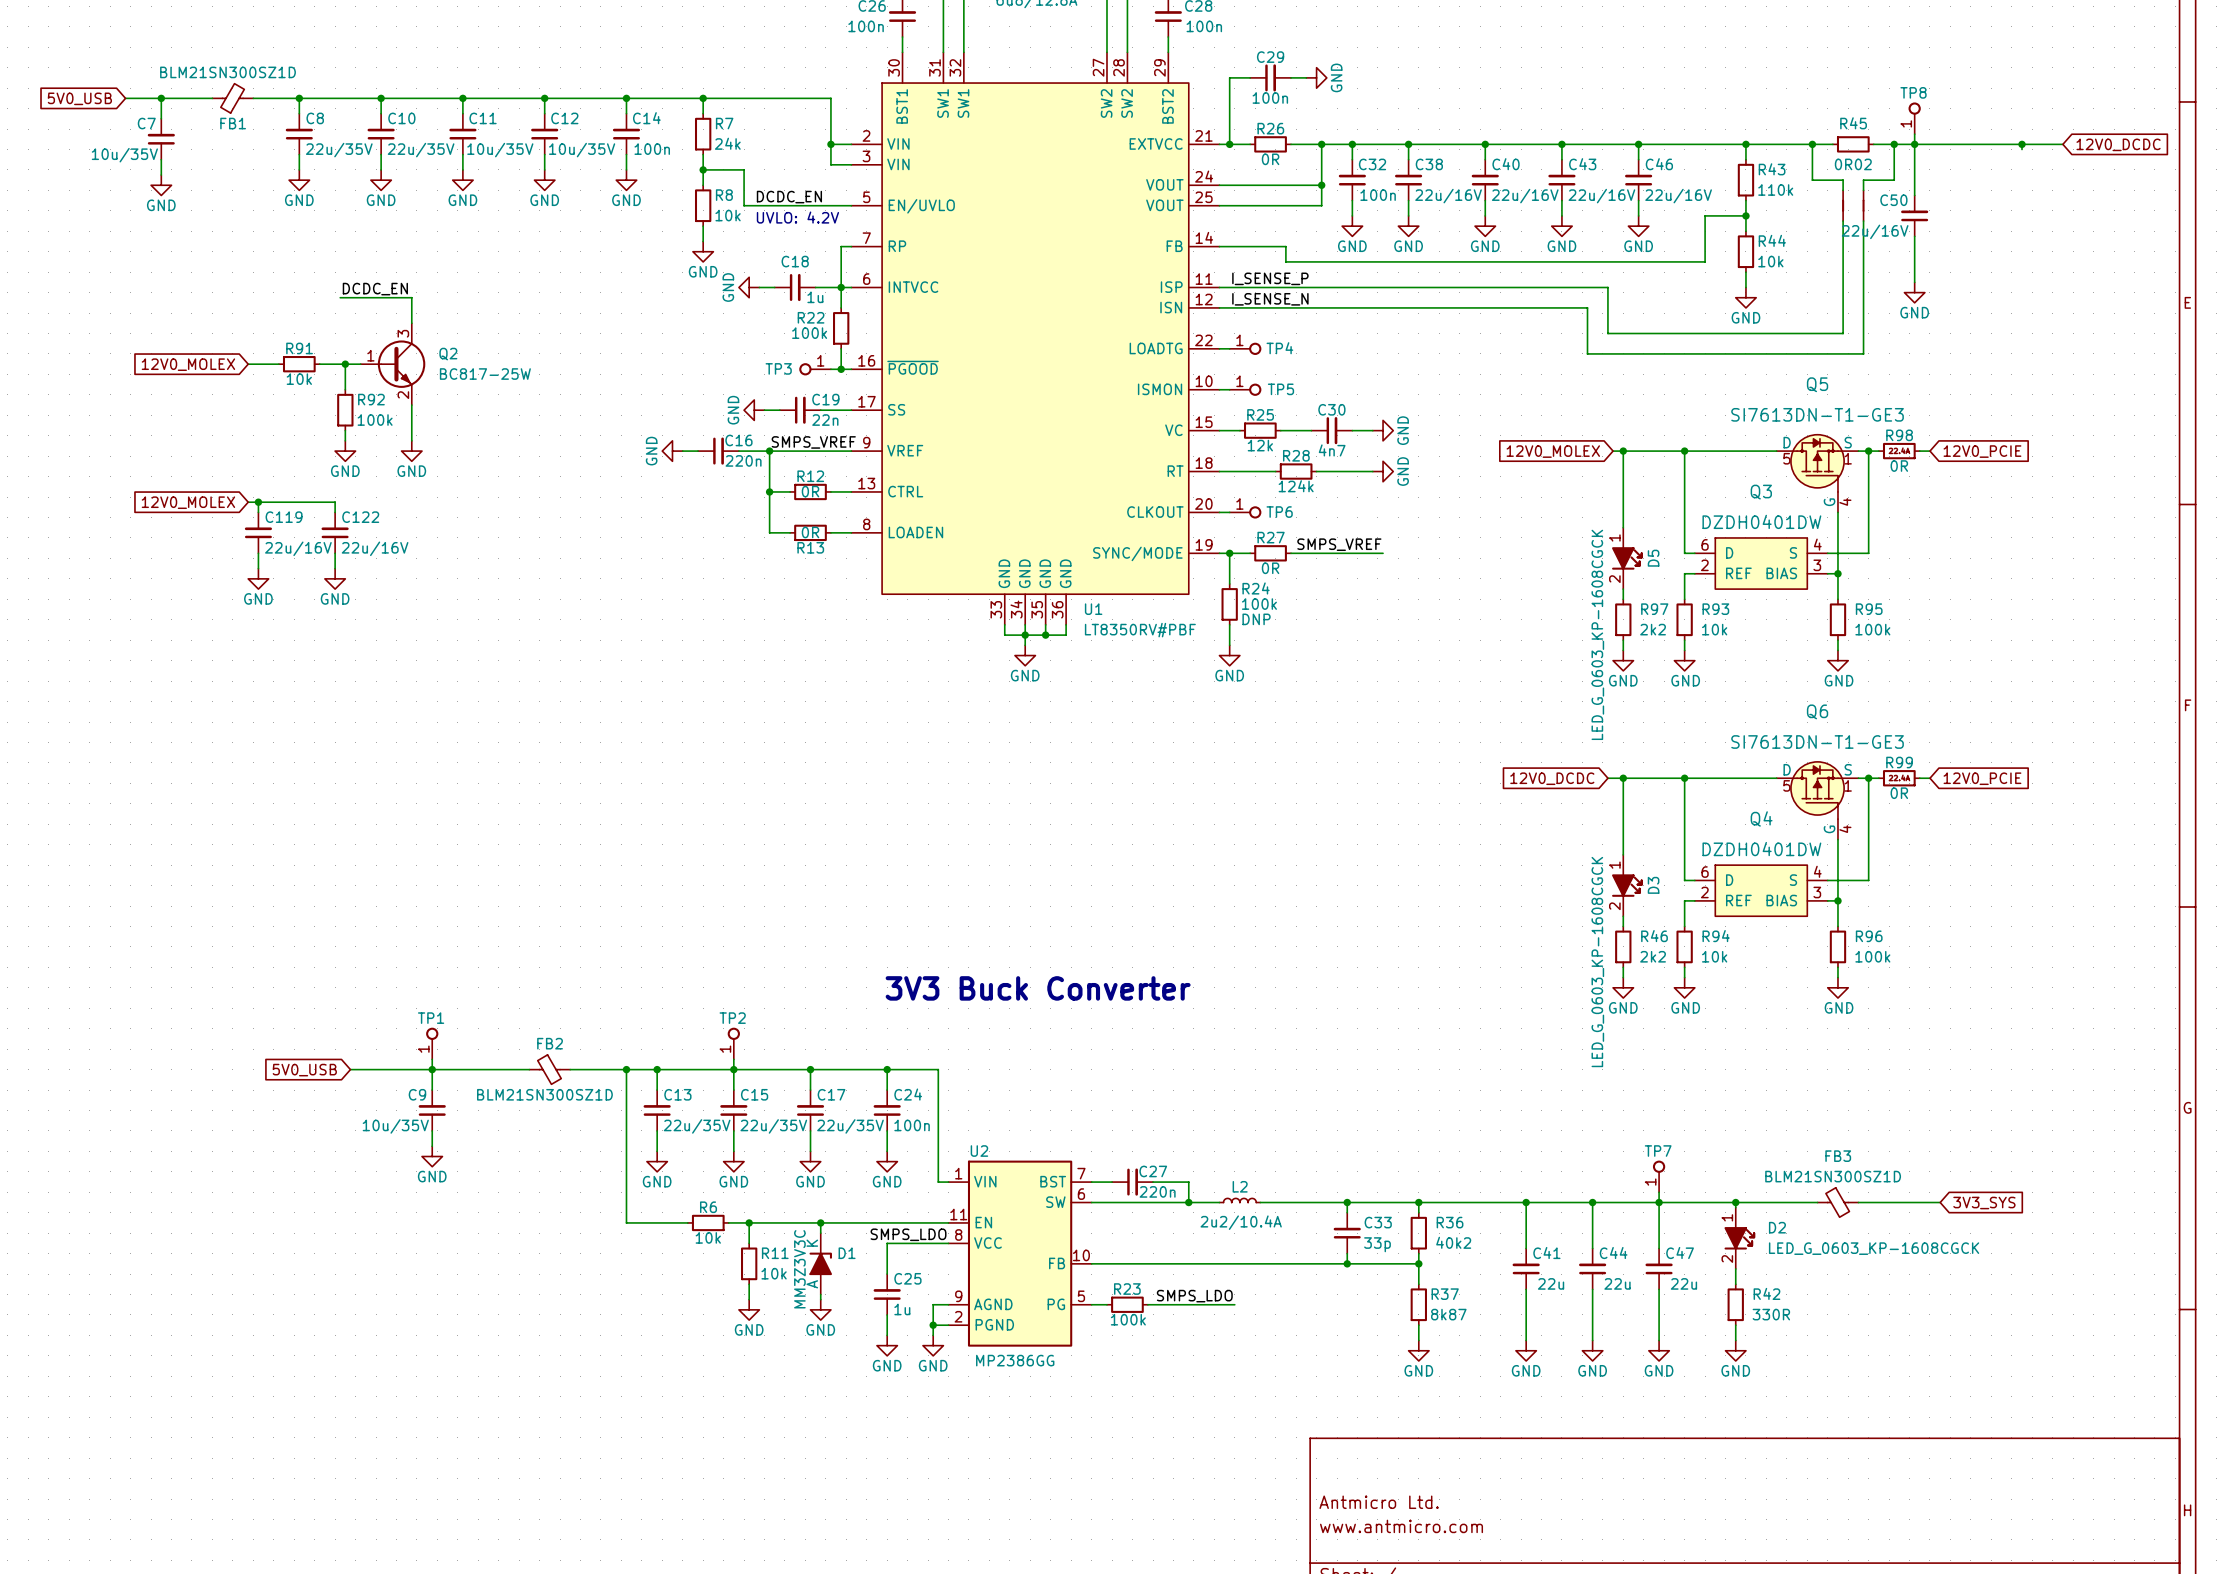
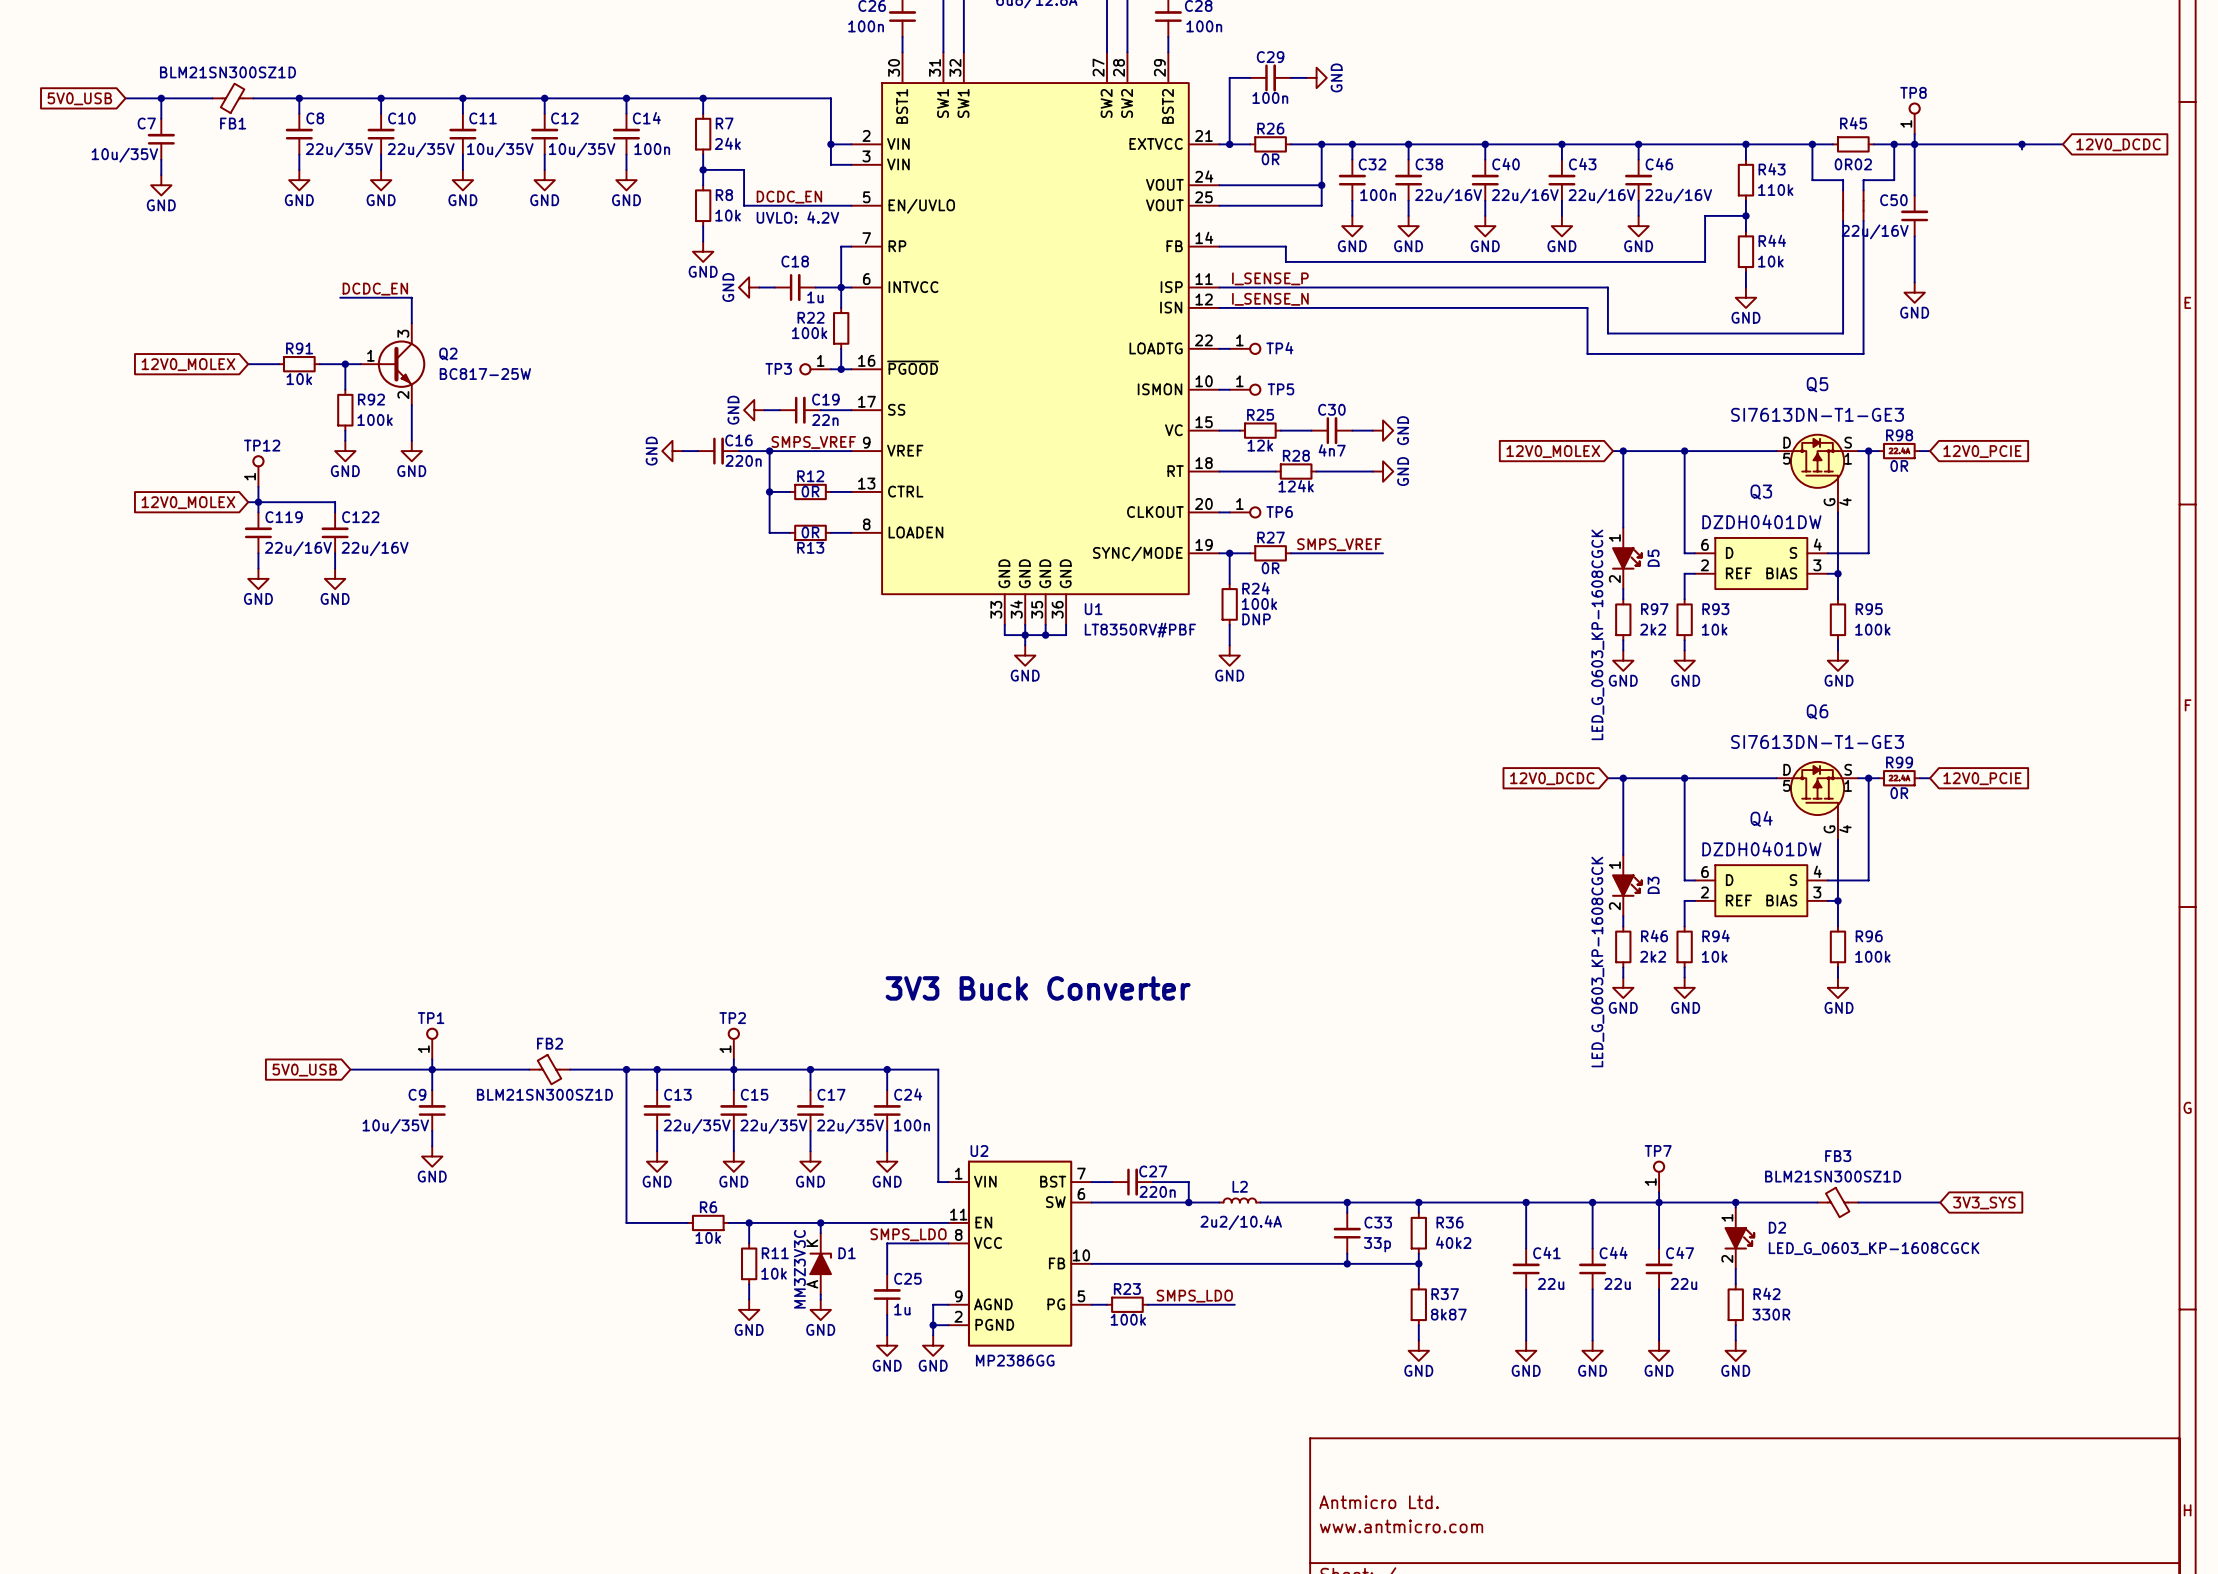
TP12: none -> (258, 471)
wire: none -> (258, 486) (258, 502)

